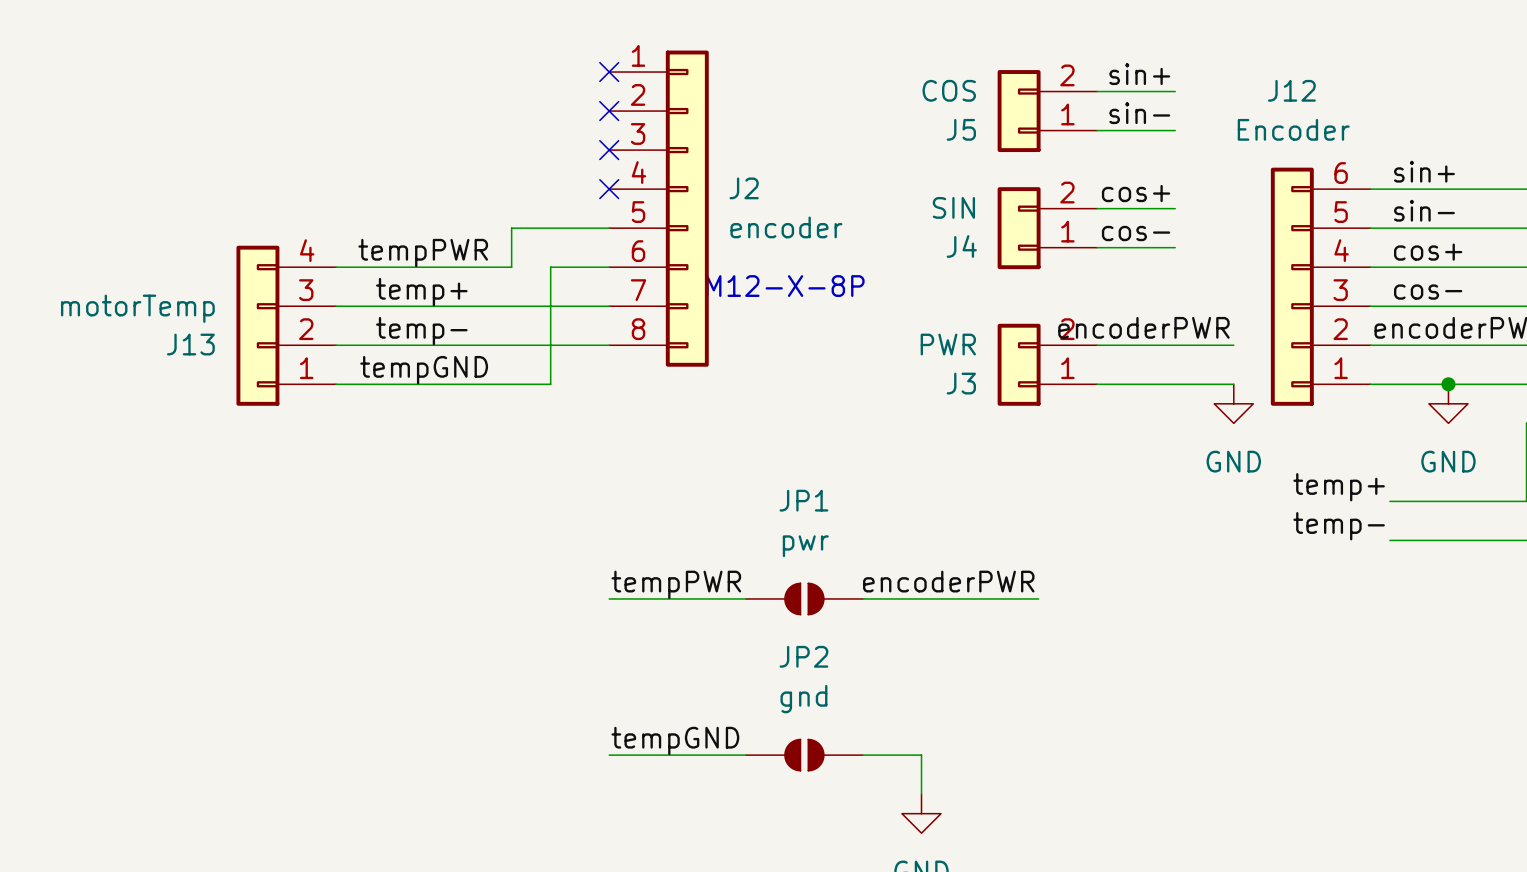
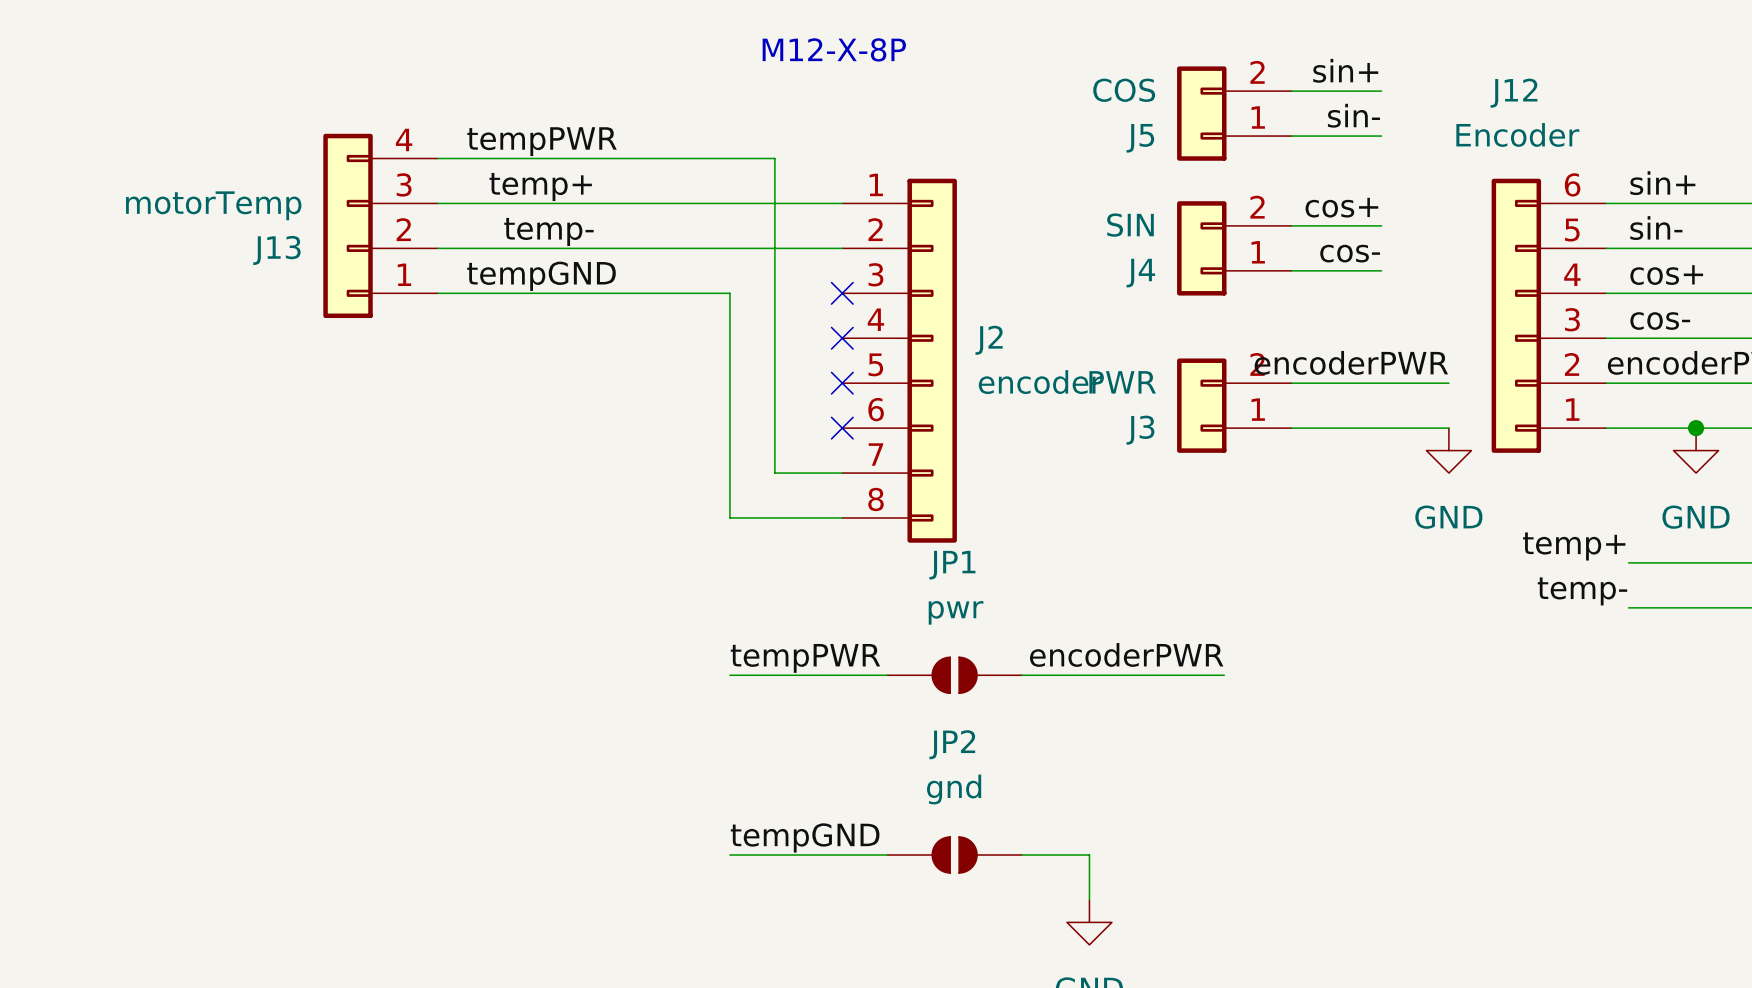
no-connect mark: (609, 72) -> none
no-connect mark: (609, 111) -> none
wire: none -> (437, 158) (774, 158) (774, 473) (842, 473)
no-connect mark: (609, 150) -> none
wire: none -> (437, 203) (842, 203)
no-connect mark: (609, 189) -> none
J2 position: (659, 208) -> (899, 360)
wire: none -> (437, 248) (617, 248)
wire: (511, 228) (511, 267) -> (662, 293) (617, 293)
label position: tempPWR (423, 253) -> tempPWR (542, 141)
wire: (550, 267) (550, 384) (336, 384) -> none
wire: none -> (729, 293) (729, 517) (842, 517)
no-connect mark: none -> (842, 293)
text position: M12-X-8P (785, 286) -> M12-X-8P (834, 49)
label position: temp+ (421, 292) -> temp+ (540, 187)
wire: (336, 306) (609, 306) -> none
no-connect mark: none -> (842, 338)
J13 position: (286, 325) -> (380, 225)
label position: temp- (421, 331) -> temp- (548, 231)
wire: (336, 345) (609, 345) -> none
no-connect mark: none -> (842, 383)
label position: tempGND (424, 370) -> tempGND (541, 276)
no-connect mark: none -> (842, 428)

